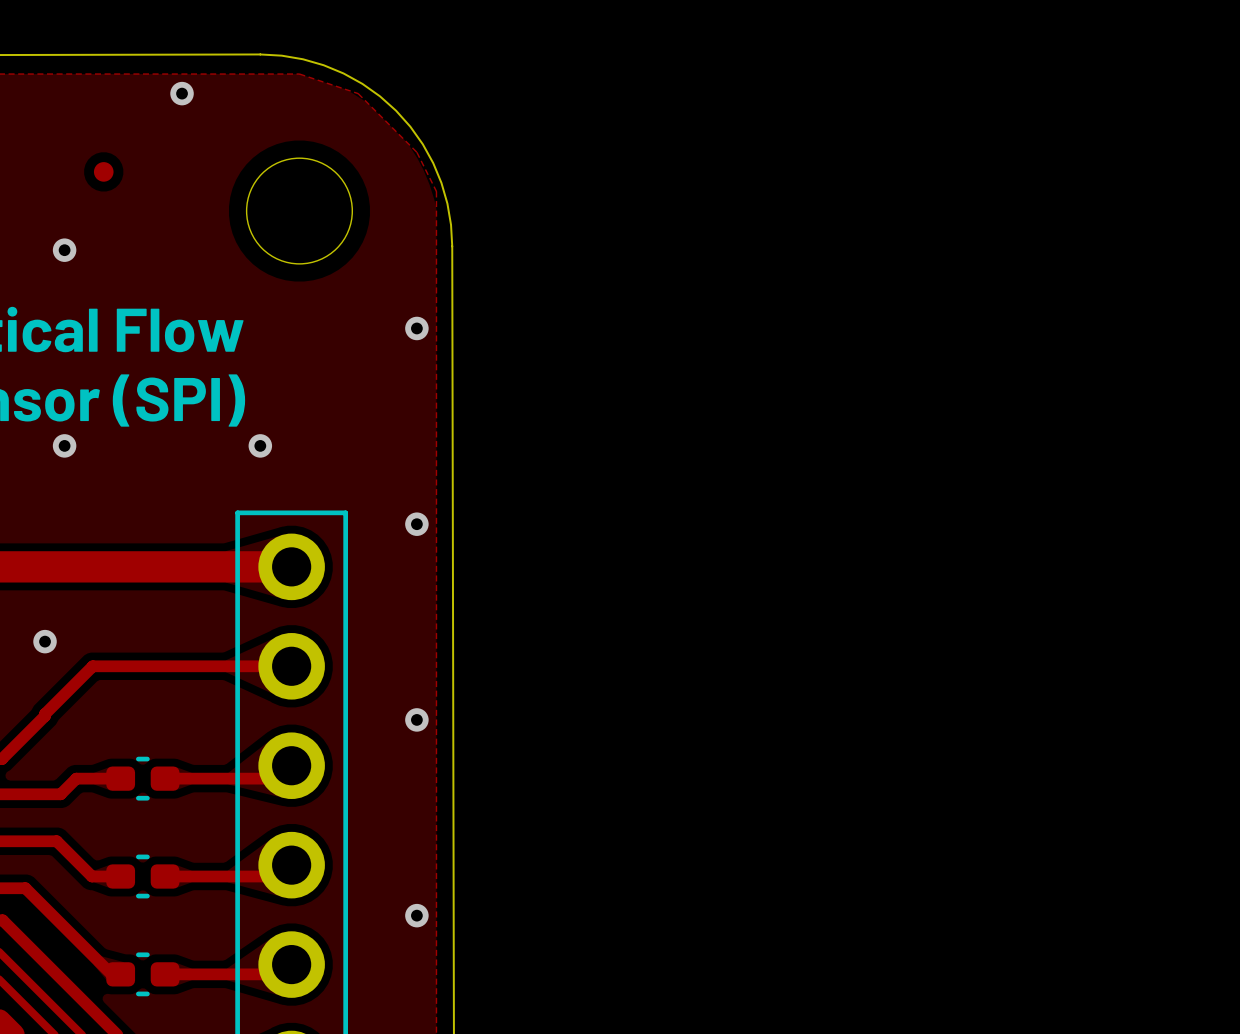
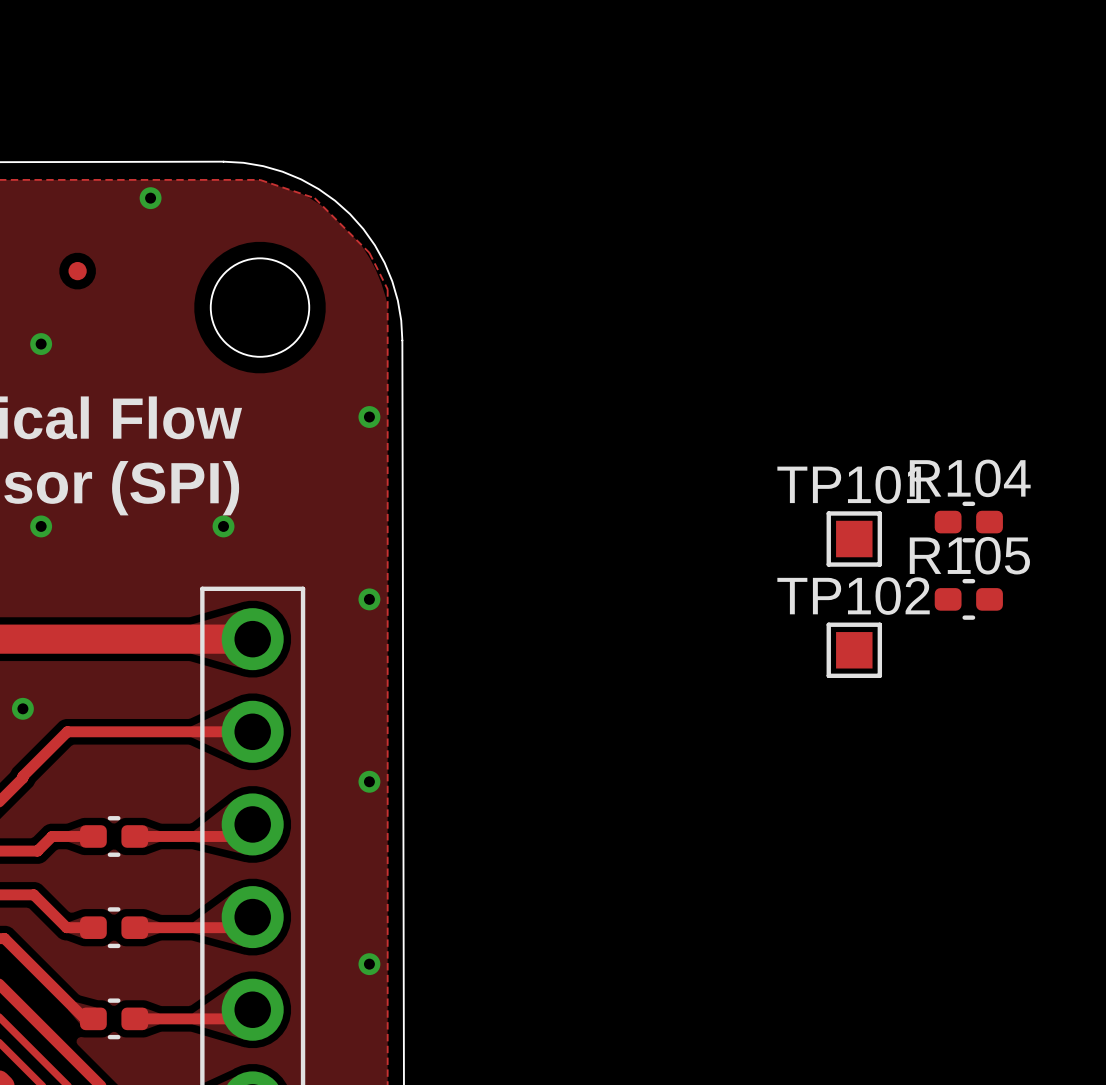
R104: none -> (968, 522)
TP101: none -> (854, 539)
R105: none -> (968, 599)
TP102: none -> (854, 650)

